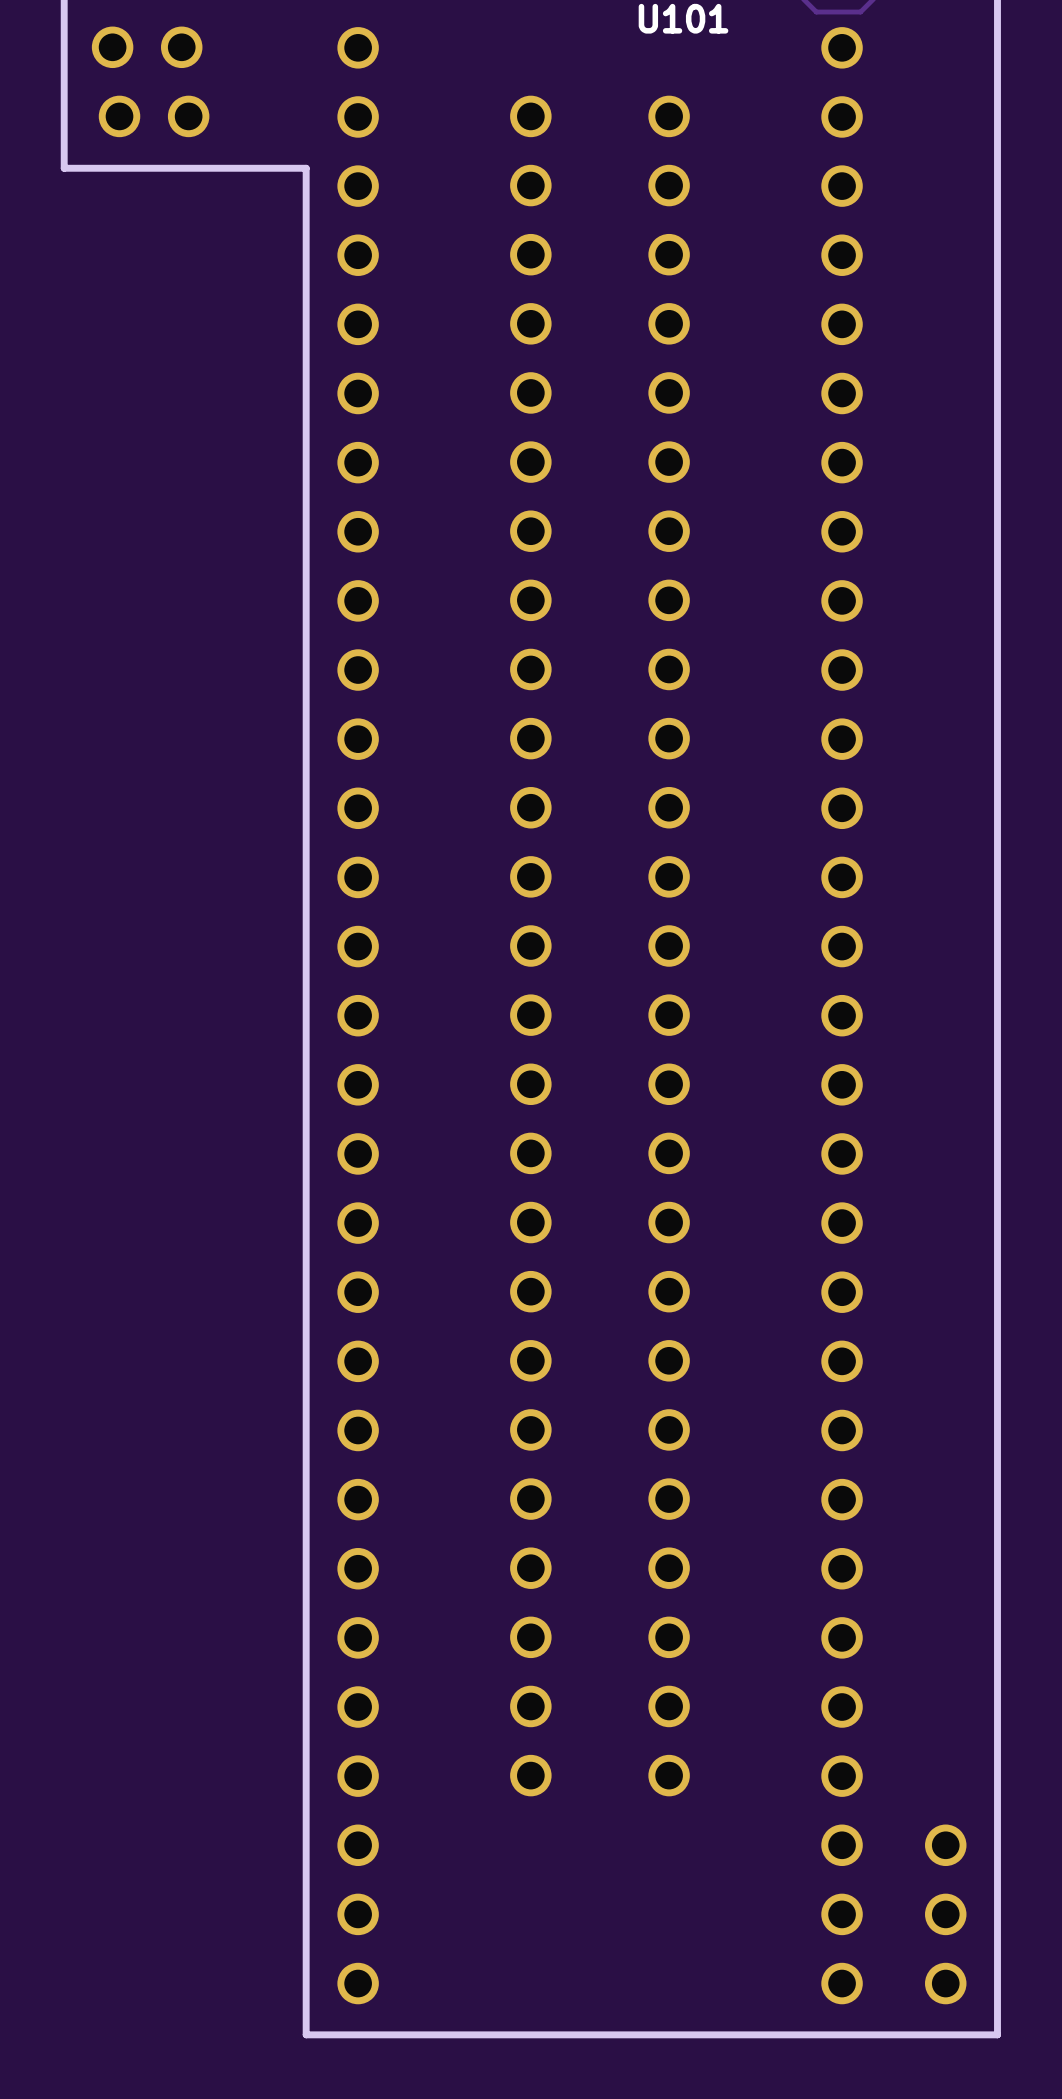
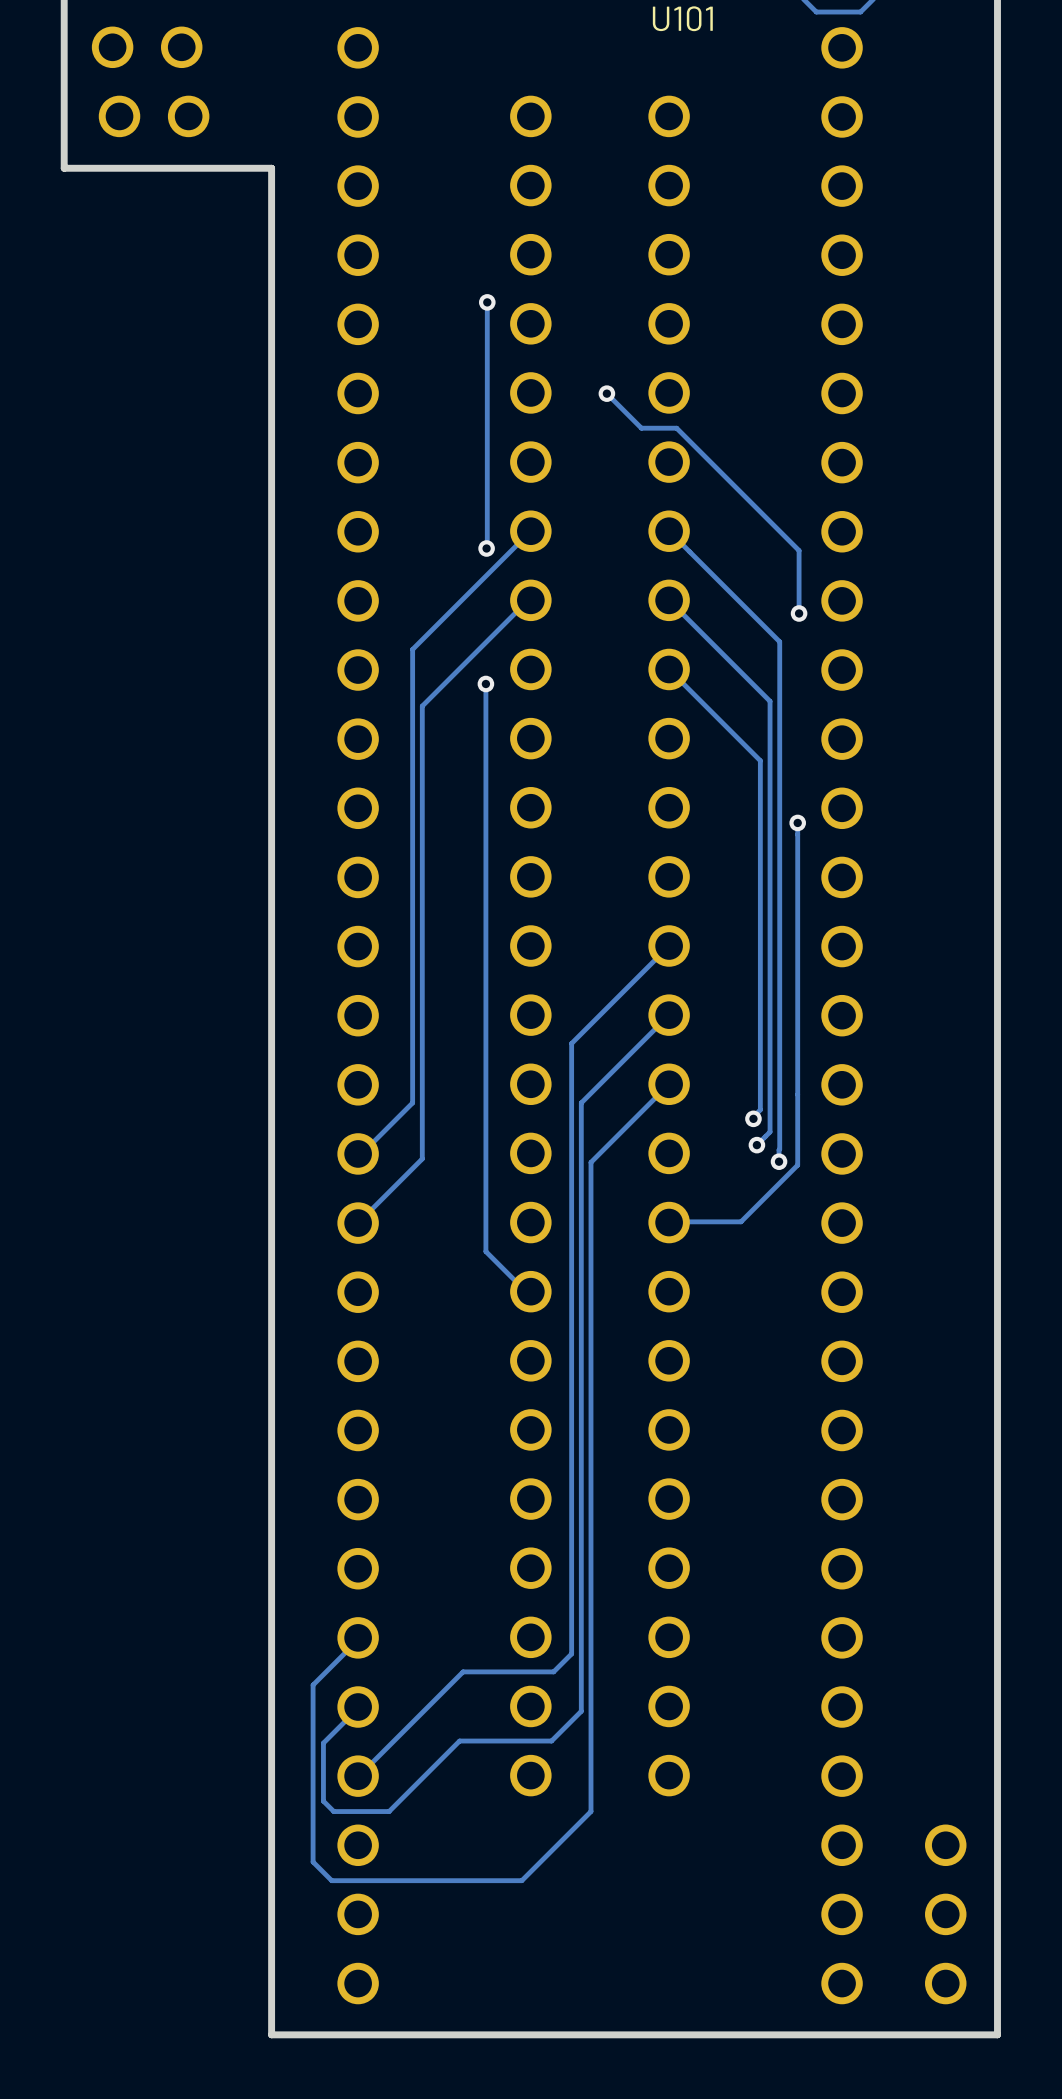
board edge: (271, 168) (306, 168) (306, 2034) -> (271, 168) (271, 2034) (306, 2034)
track: none -> (487, 302) (486, 548)
via: none -> (487, 302)
track: none -> (606, 393) (641, 428) (676, 428) (799, 550) (799, 613)
via: none -> (606, 393)
track: none -> (530, 531) (412, 649) (412, 1102) (358, 1157)
track: none -> (669, 531) (779, 641) (779, 1161)
via: none -> (486, 548)
track: none -> (529, 598) (422, 706) (422, 1158) (358, 1223)
track: none -> (669, 600) (770, 701) (770, 1131) (756, 1145)
via: none -> (799, 613)
track: none -> (669, 669) (760, 760) (760, 1109) (753, 1116)
track: none -> (485, 683) (485, 1251) (528, 1293)
via: none -> (485, 683)
track: none -> (797, 822) (797, 1165) (741, 1221) (669, 1221)
via: none -> (797, 822)
track: none -> (669, 946) (571, 1043) (571, 1653) (553, 1671) (463, 1671) (358, 1776)
track: none -> (669, 1015) (581, 1102) (581, 1711) (551, 1741) (459, 1741) (389, 1811) (333, 1811) (323, 1801) (323, 1743) (358, 1708)
track: none -> (669, 1084) (590, 1162) (590, 1811) (521, 1880) (331, 1880) (313, 1862) (313, 1685) (359, 1638)
via: none -> (753, 1118)
via: none -> (756, 1145)
via: none -> (779, 1161)

